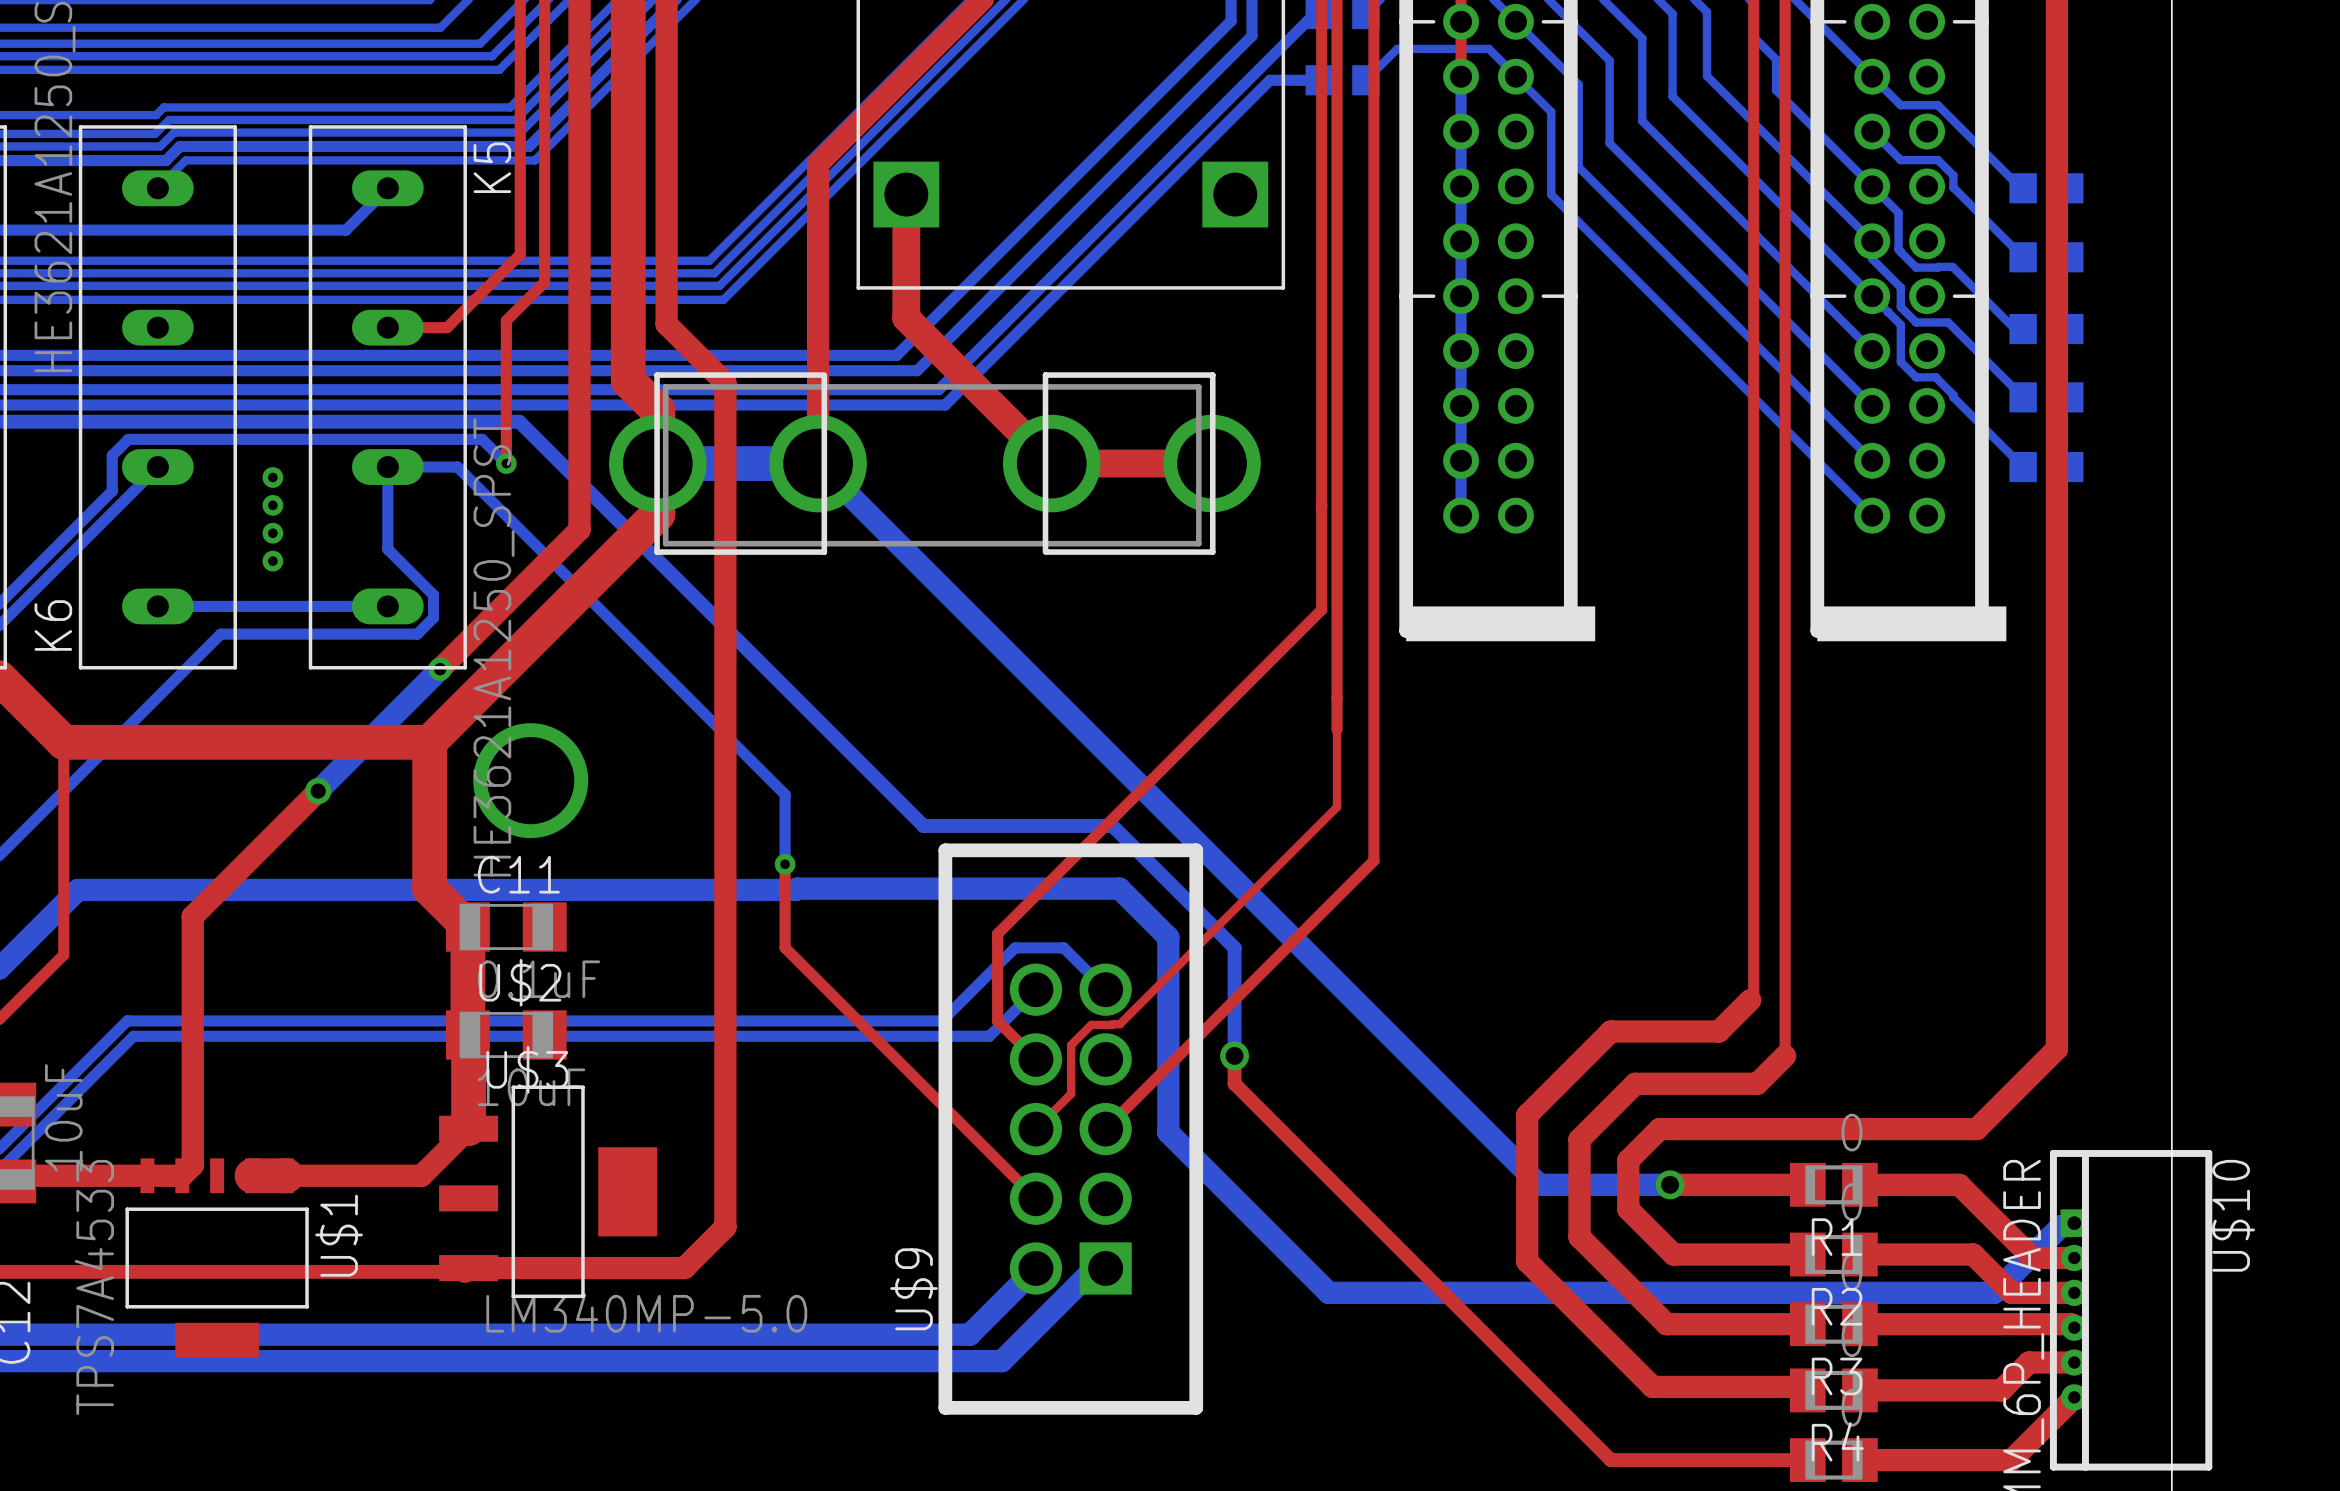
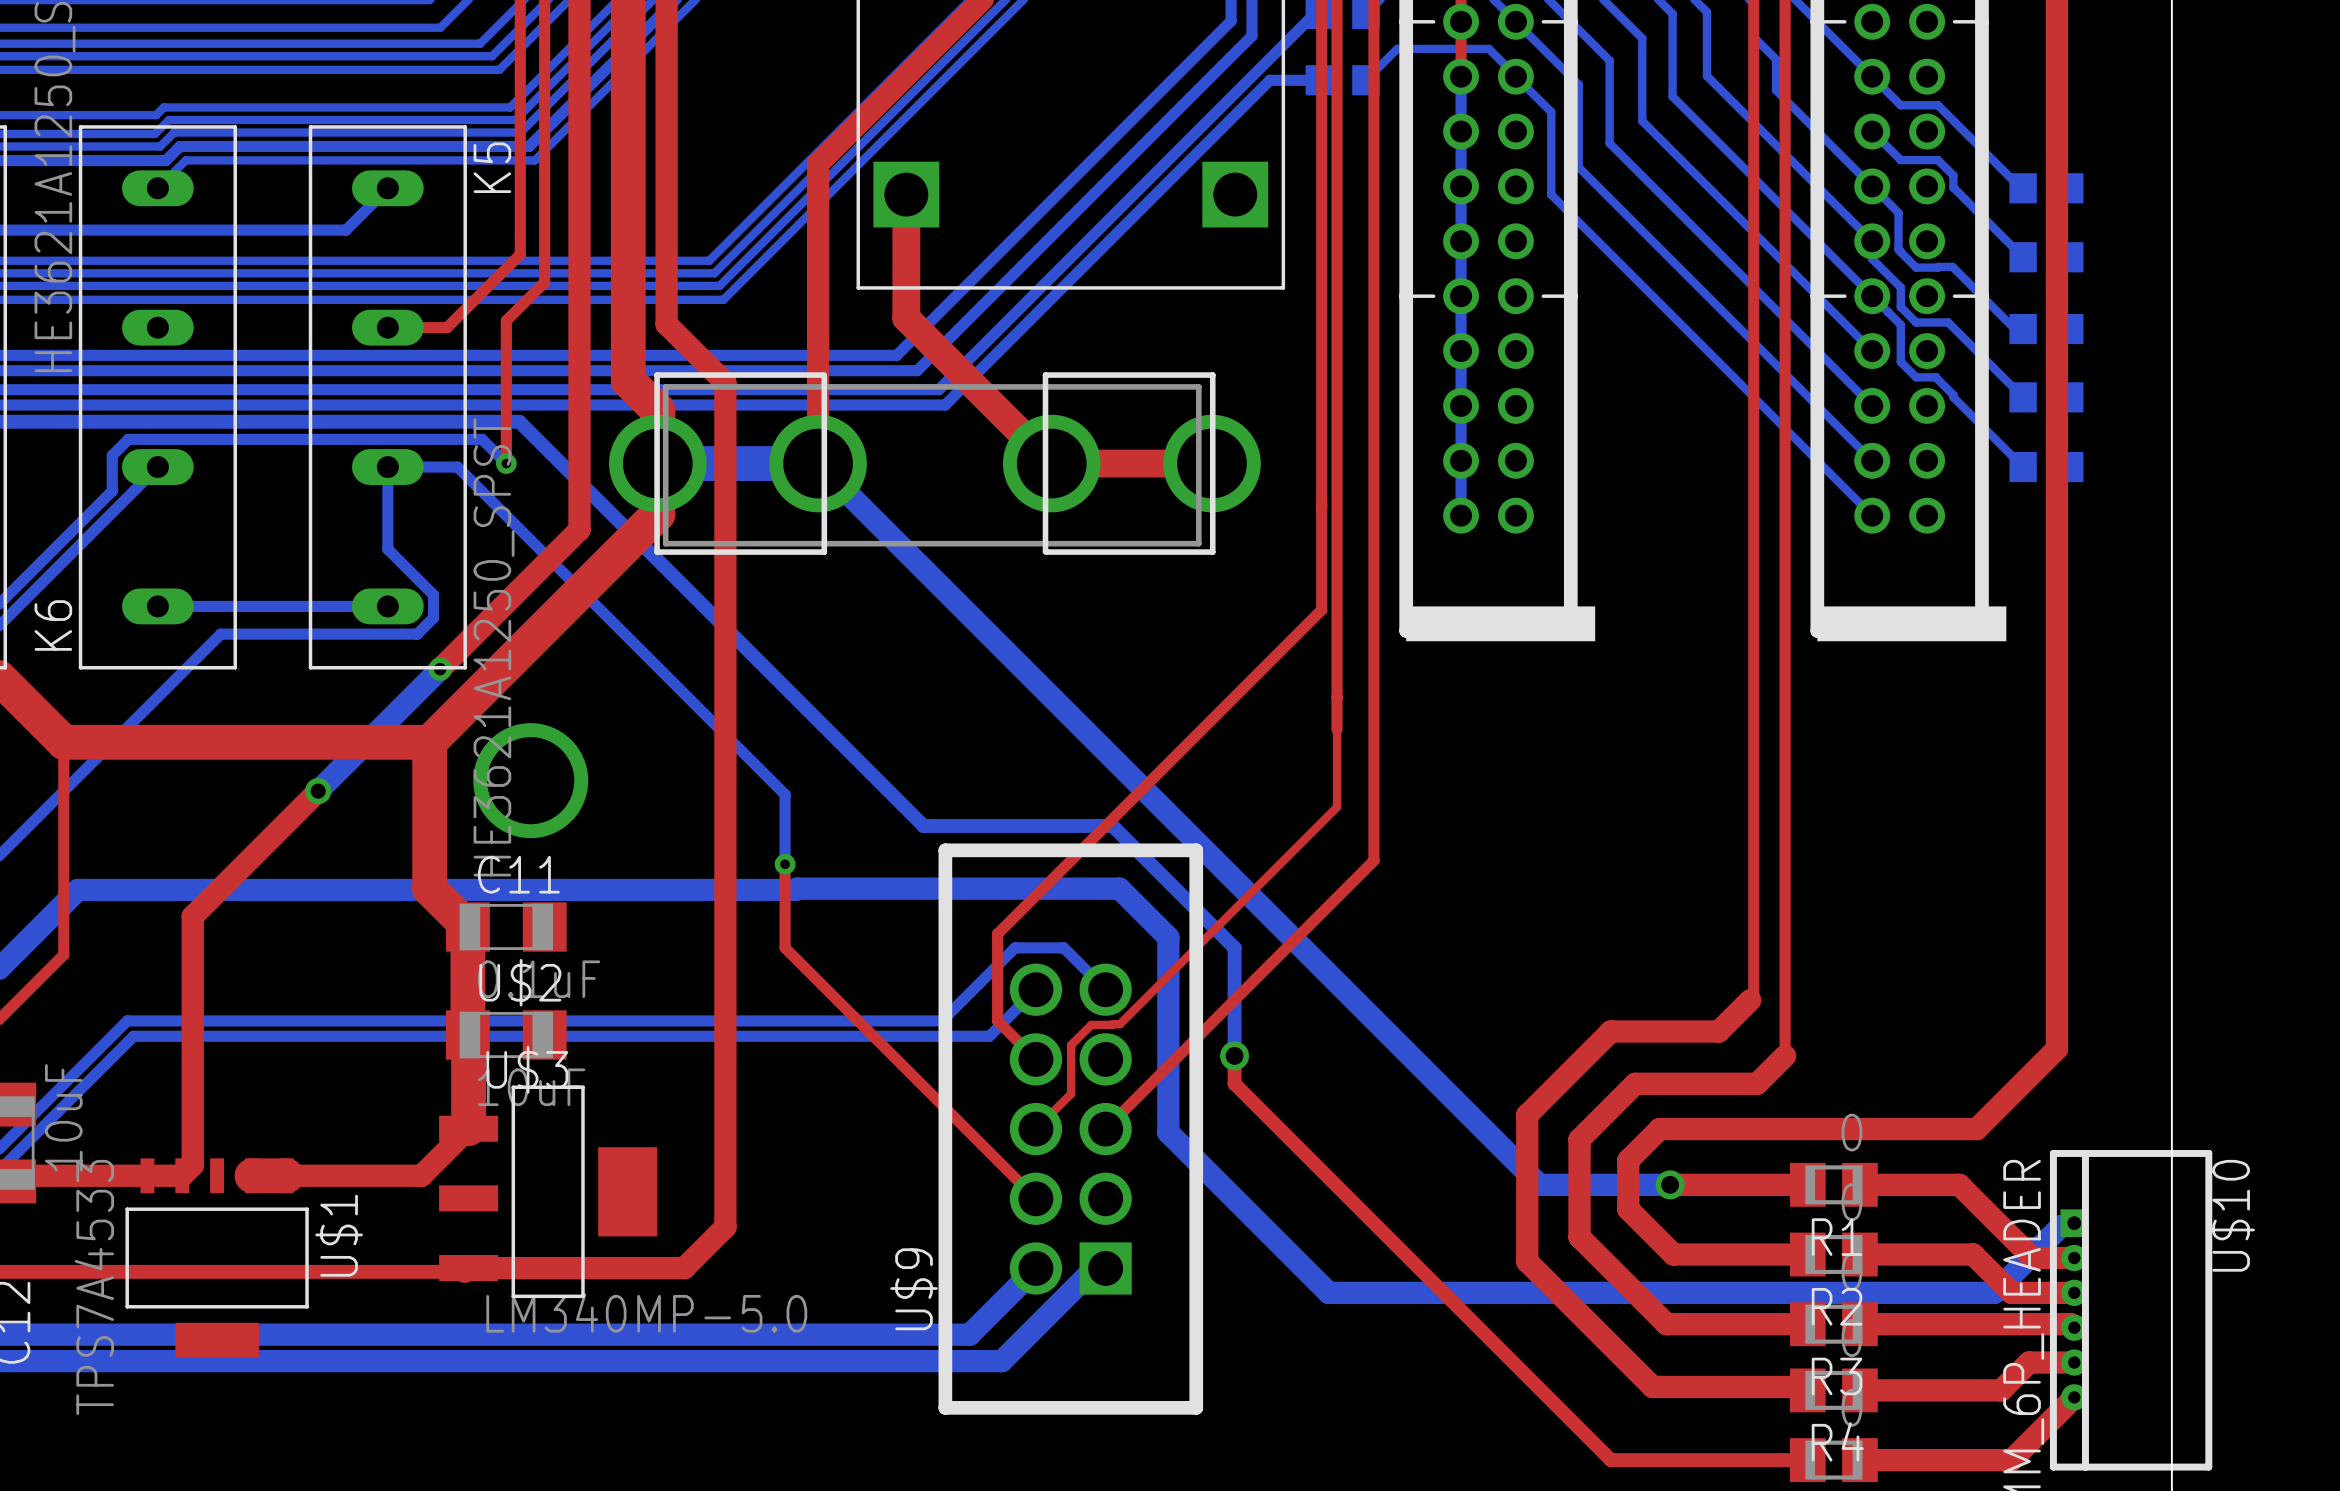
via: (272, 477) -> none
via: (272, 505) -> none
via: (272, 533) -> none
via: (272, 561) -> none

